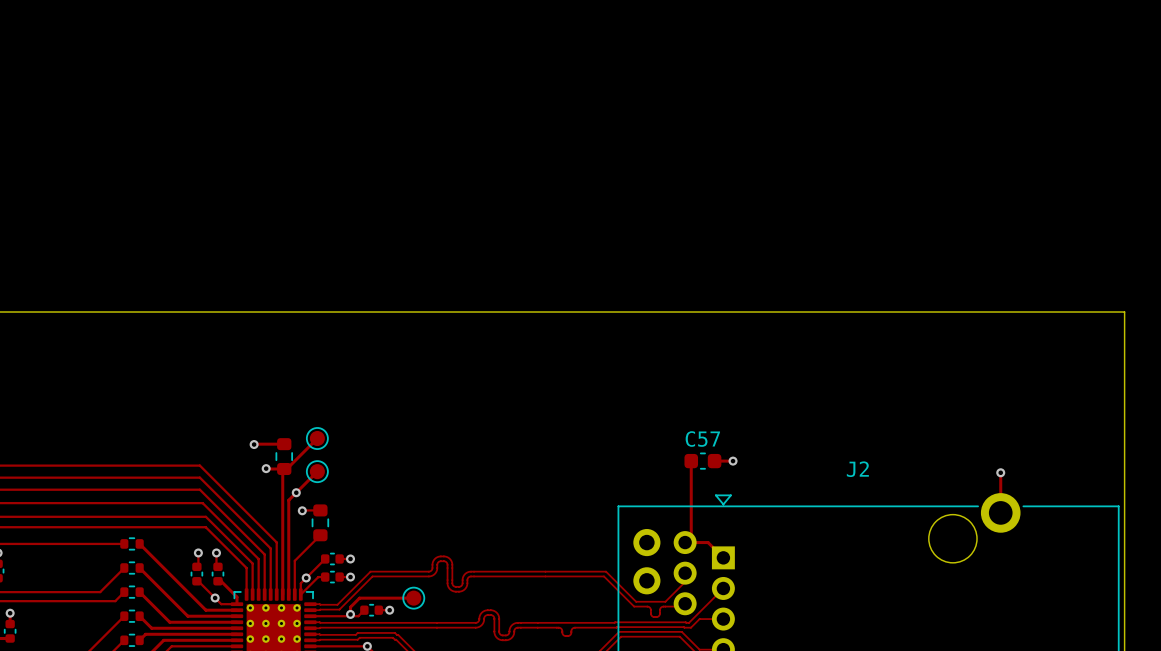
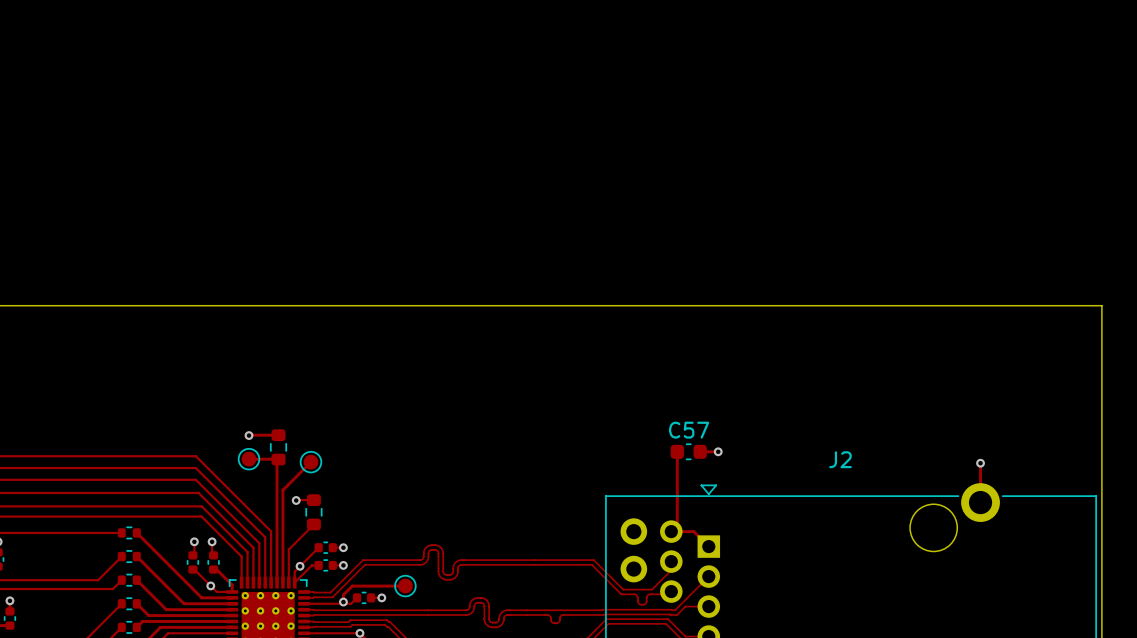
track: (317, 438) (286, 469) (266, 468) -> none
part position: (317, 438) -> (249, 459)
track: none -> (249, 459) (278, 459)
via: (266, 468) -> none
via: (296, 492) -> none

